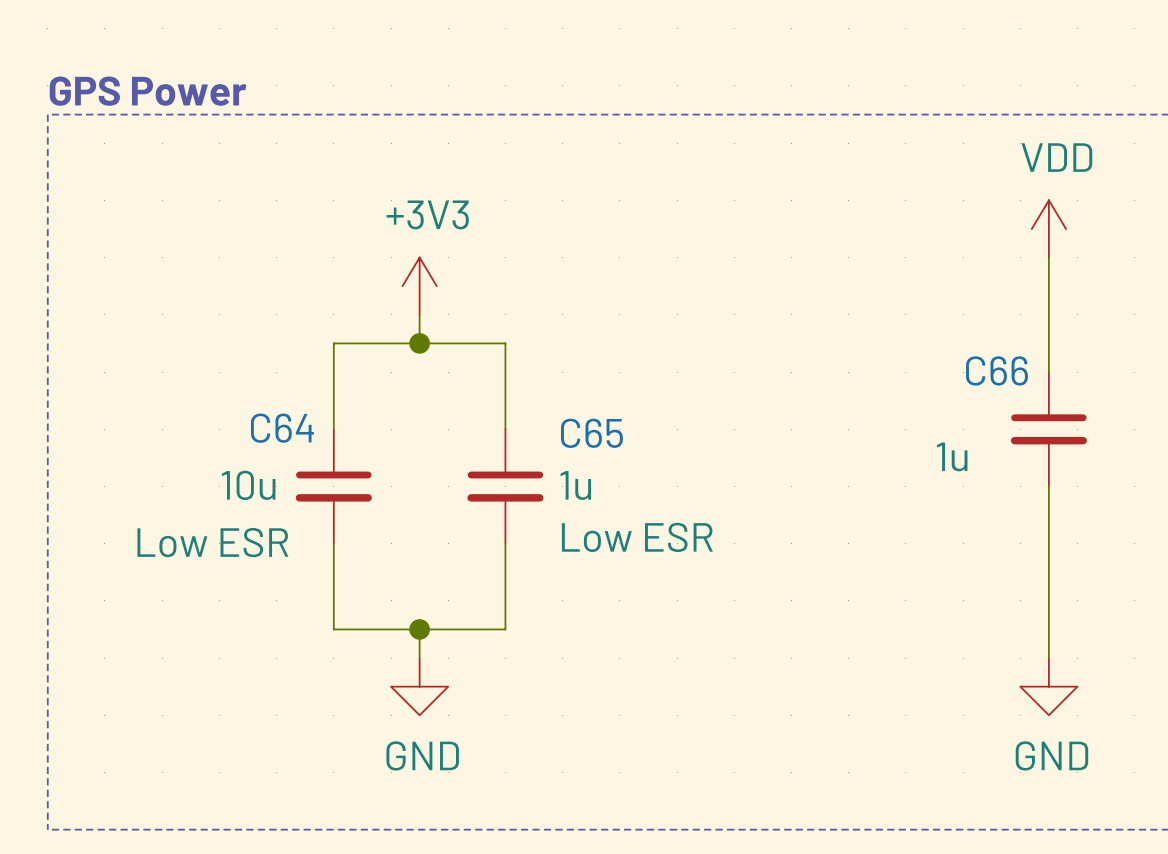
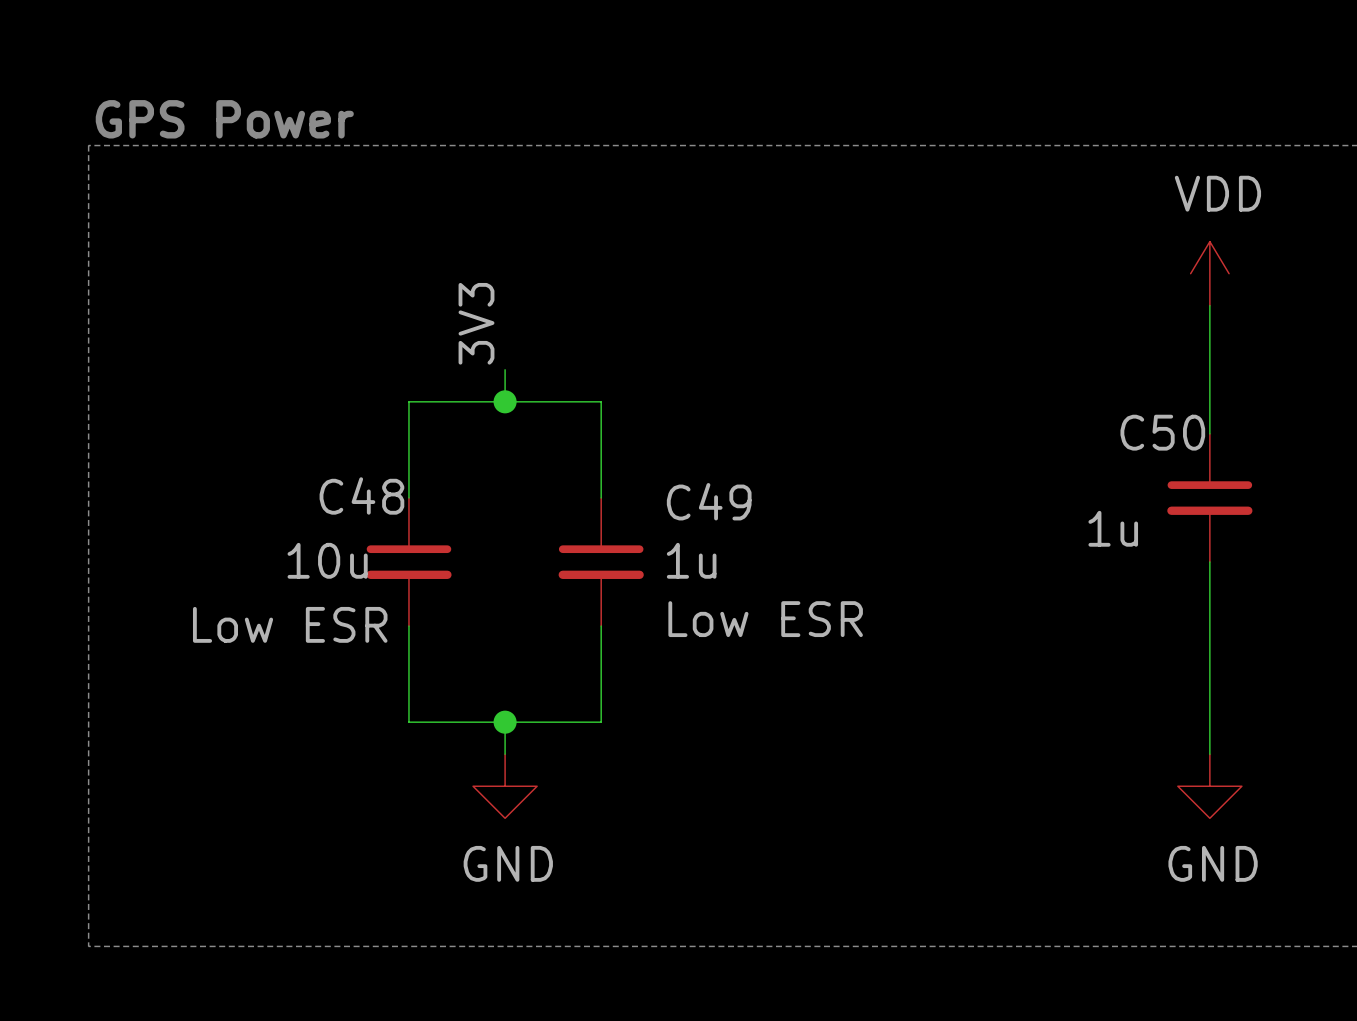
label: none -> 3V3 (476, 323)
power symbol: +3V3 (419, 286) -> none
C66 name: C66 (996, 370) -> C50 (1162, 432)
C64 name: C64 (282, 428) -> C48 (361, 495)
C65 name: C65 (591, 433) -> C49 (709, 501)

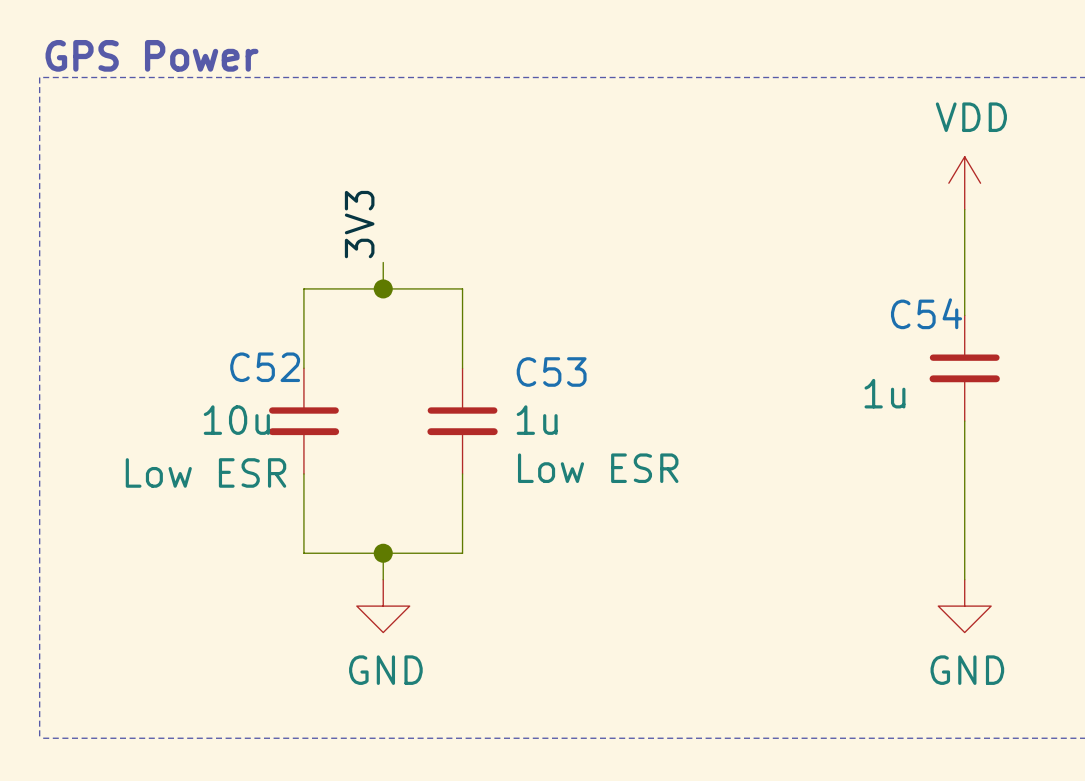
C50 name: C50 (1162, 432) -> C54 (926, 313)
C48 name: C48 (361, 495) -> C52 (265, 367)
C49 name: C49 (709, 501) -> C53 (551, 372)

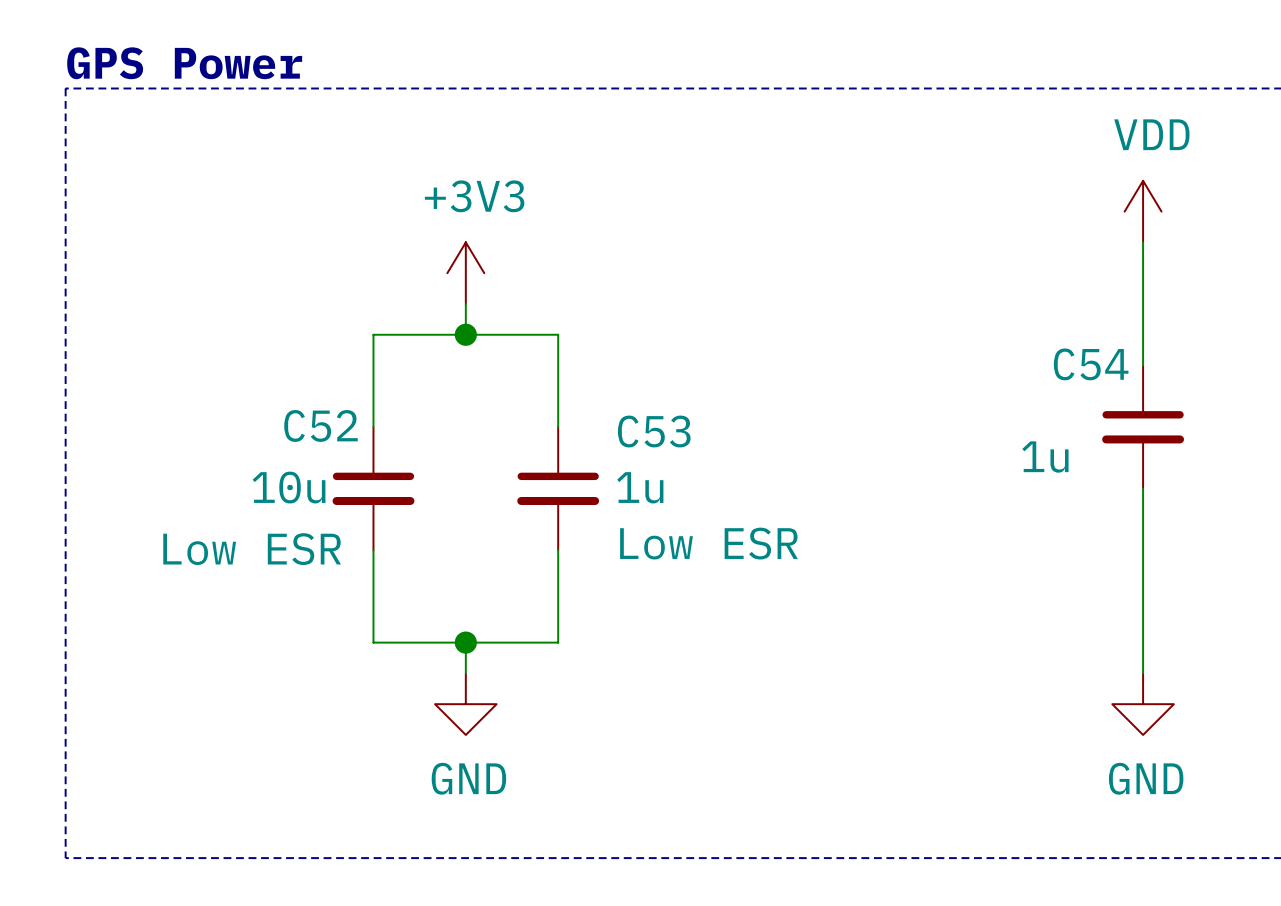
label: 3V3 (359, 224) -> none
power symbol: none -> +3V3 (465, 273)

